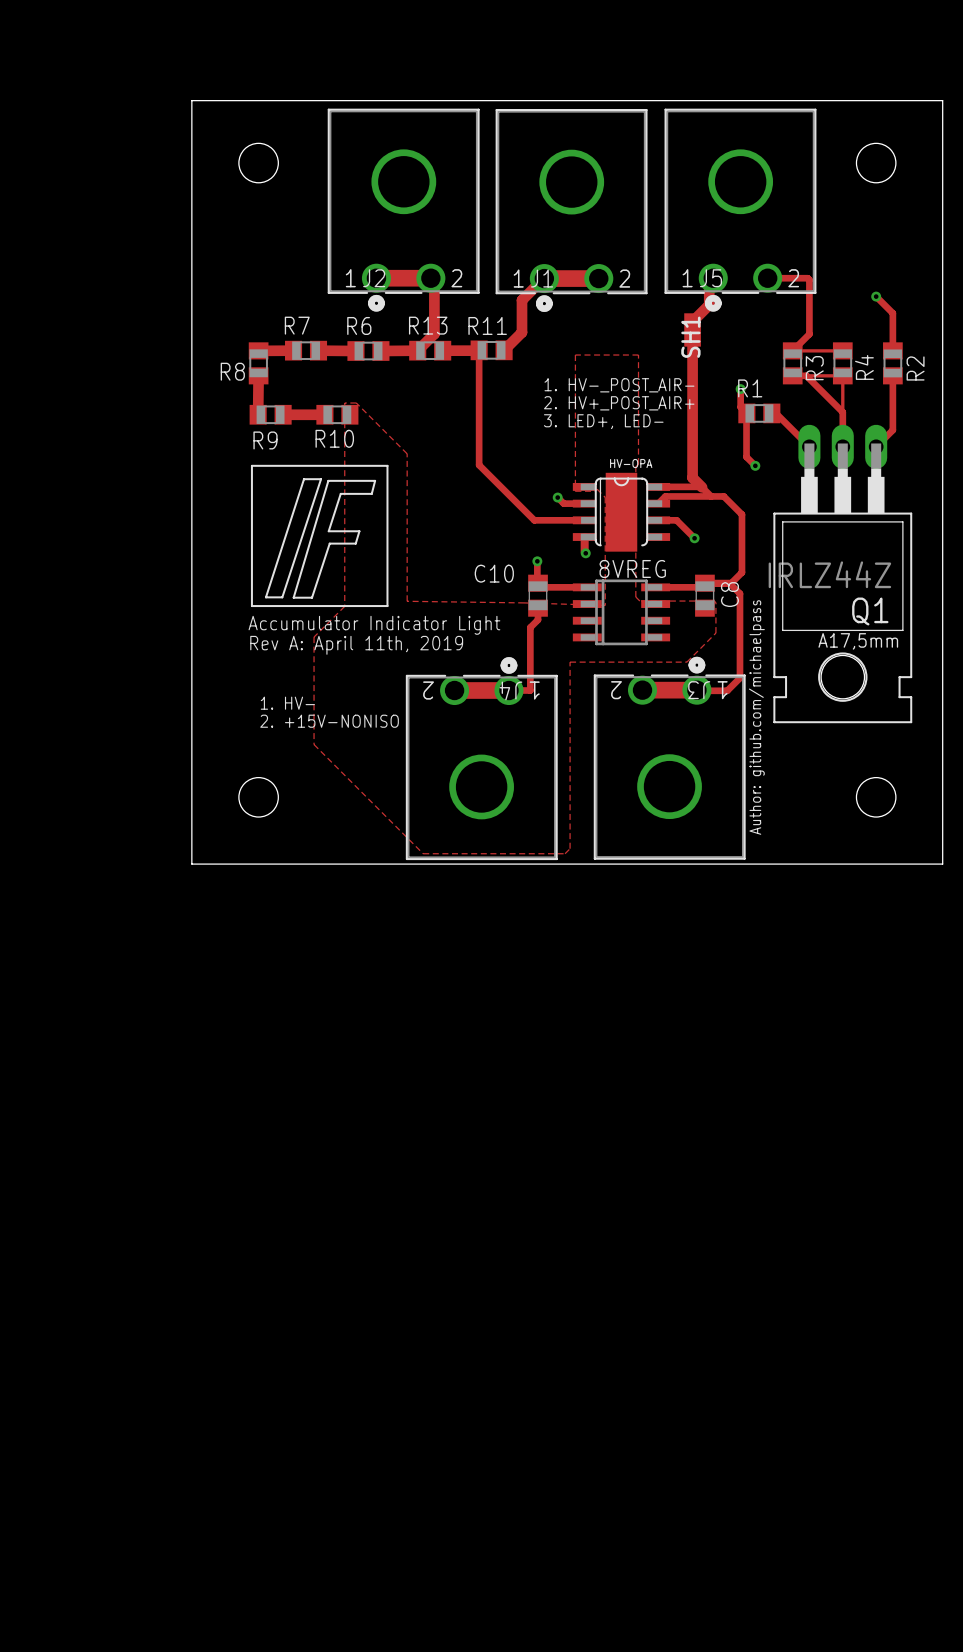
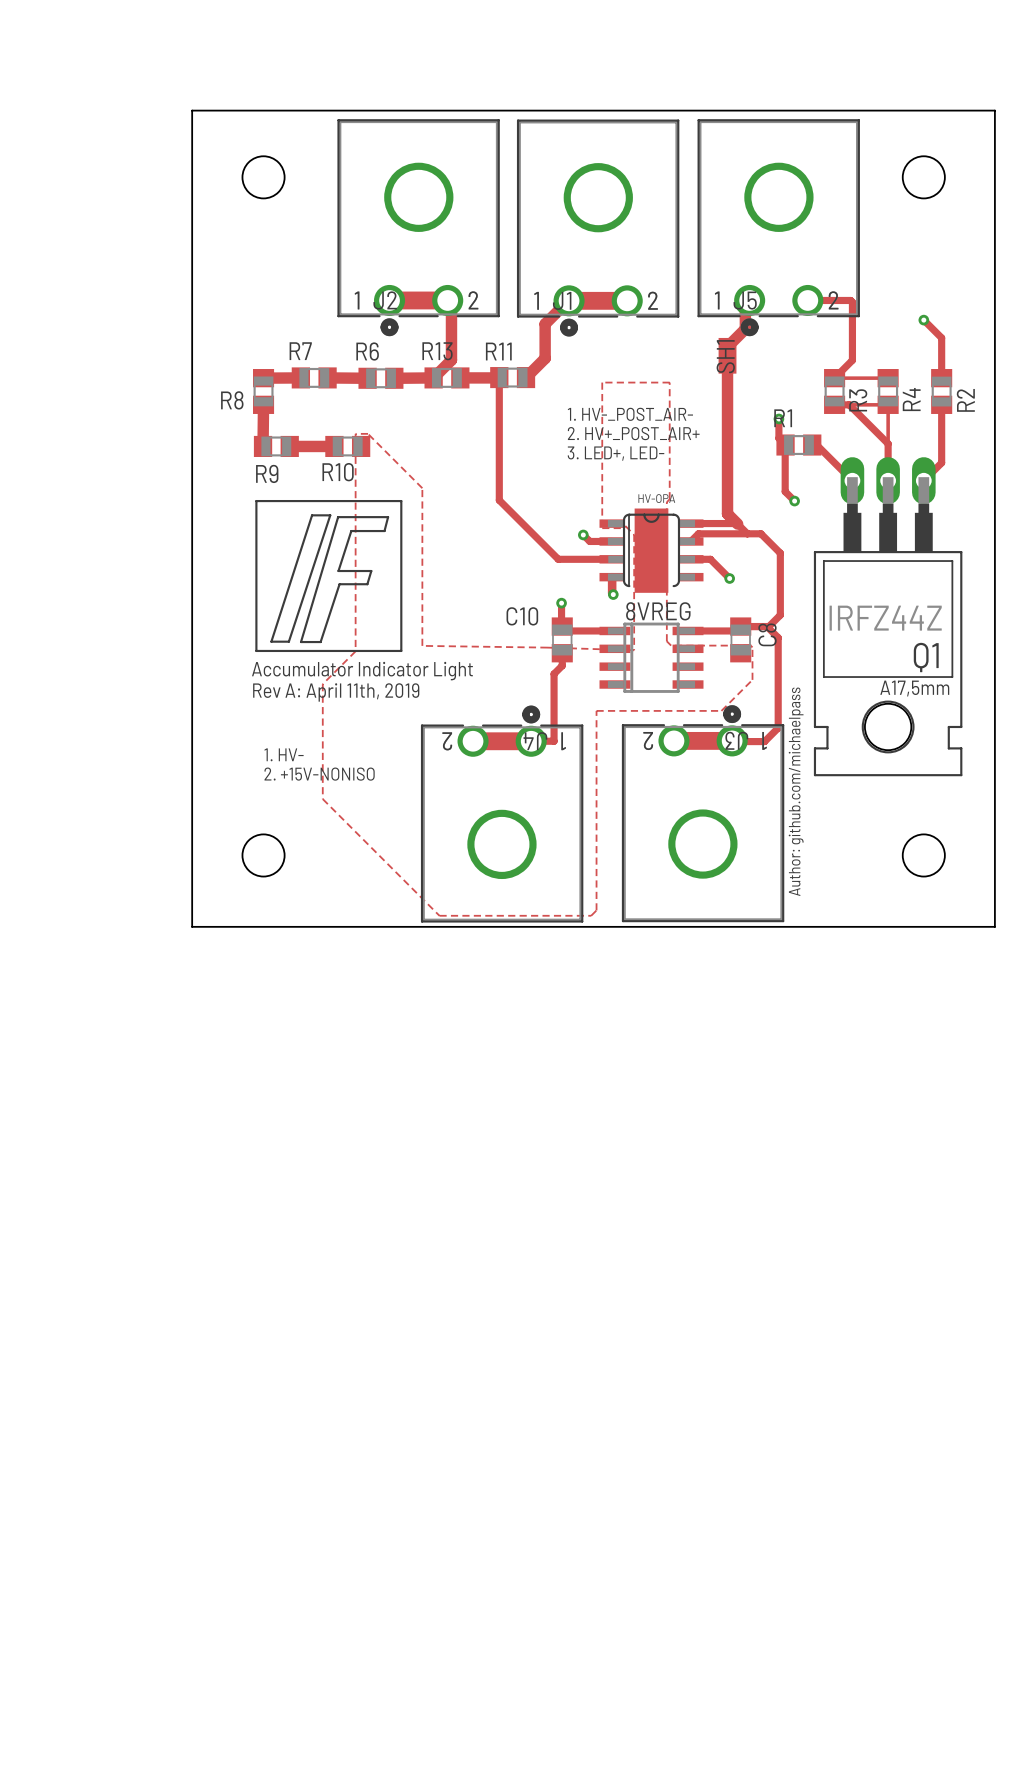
Q1 value: IRLZ44Z (829, 574) -> IRFZ44Z (885, 618)

